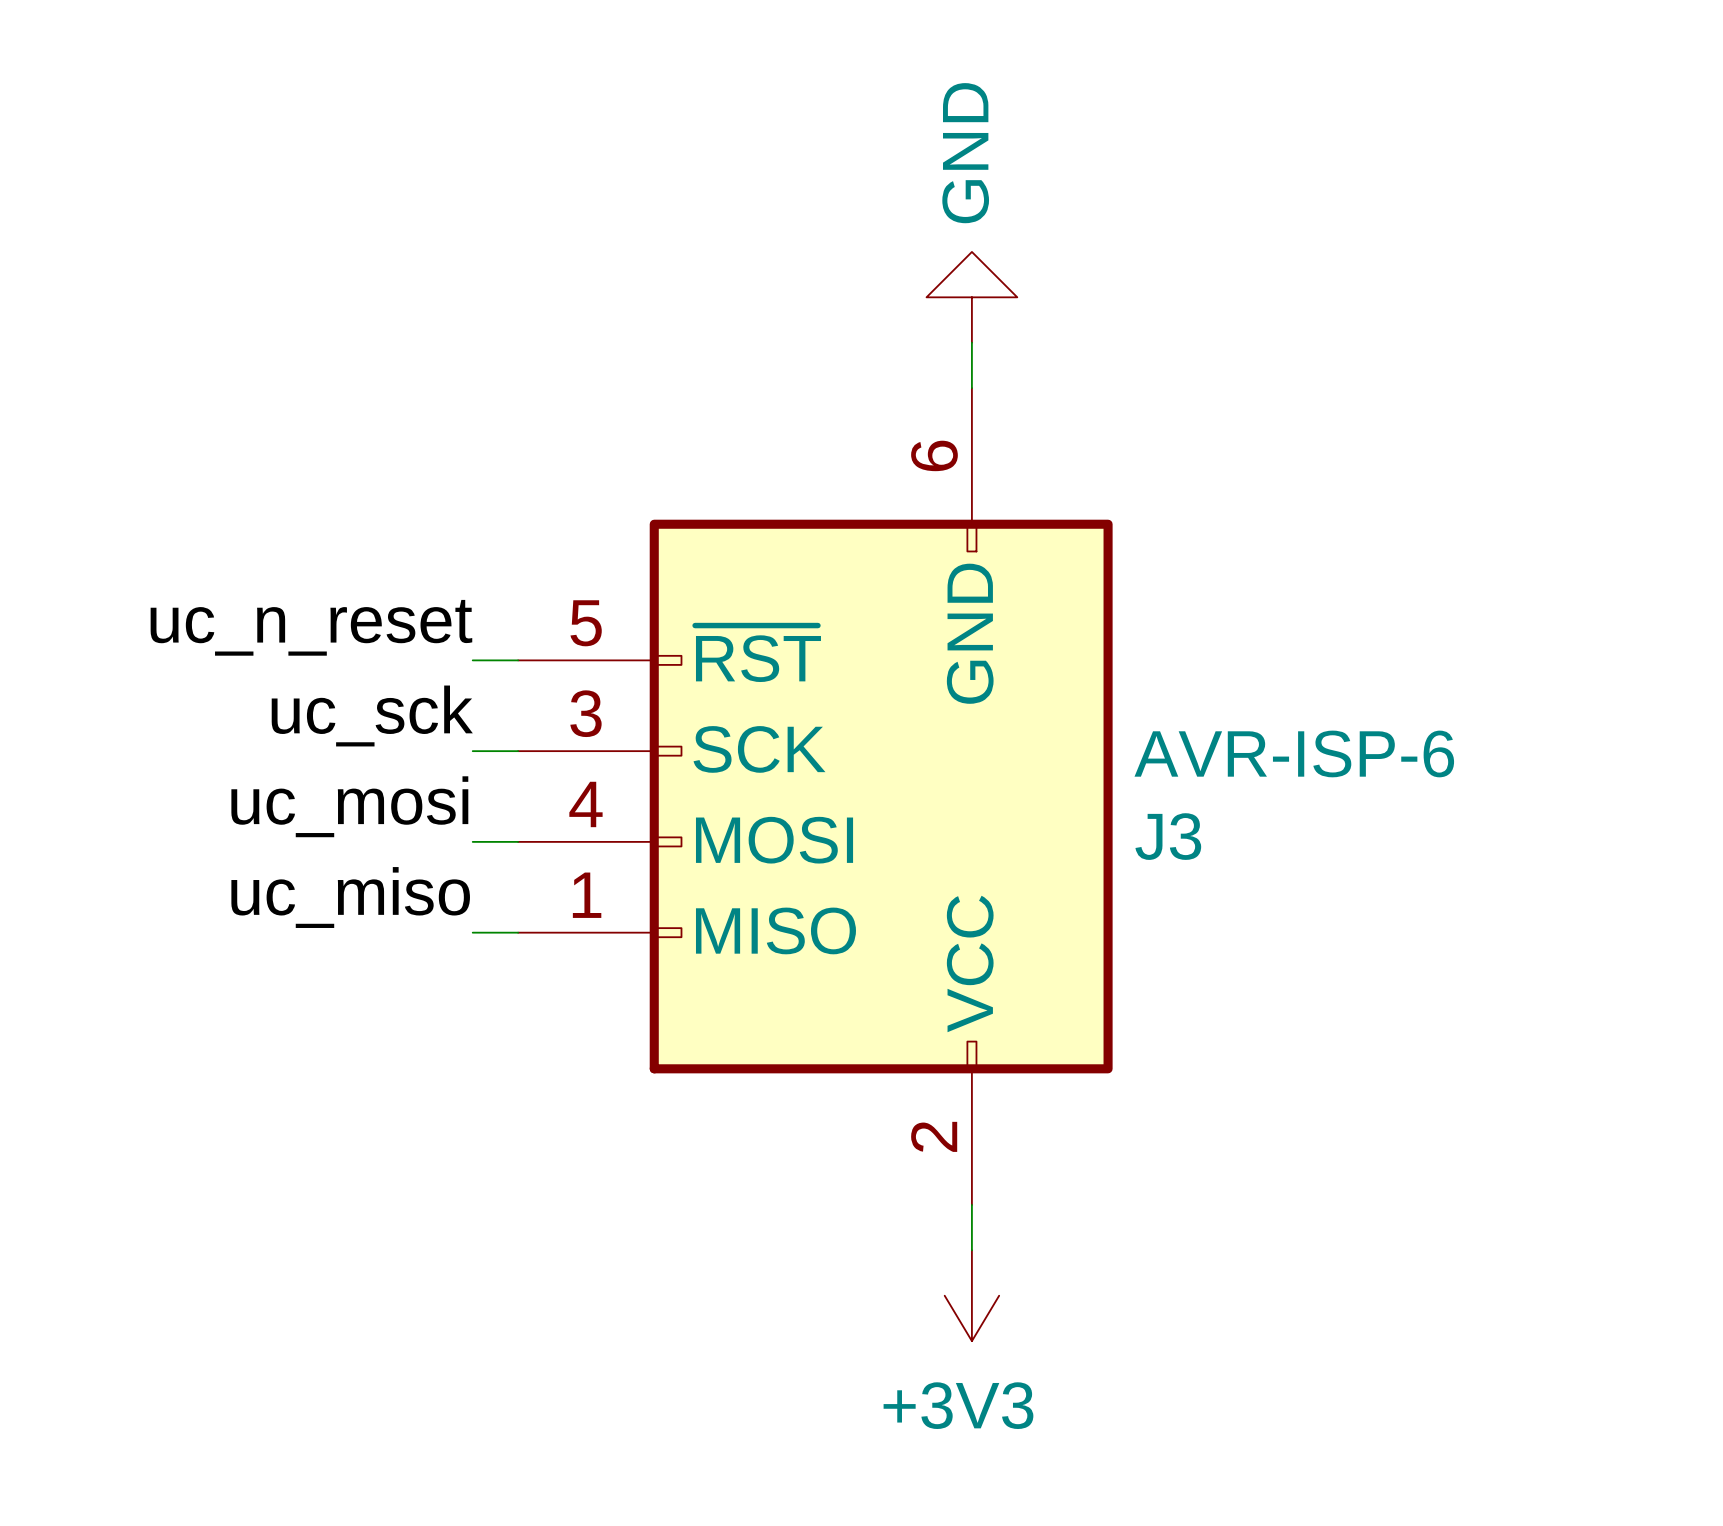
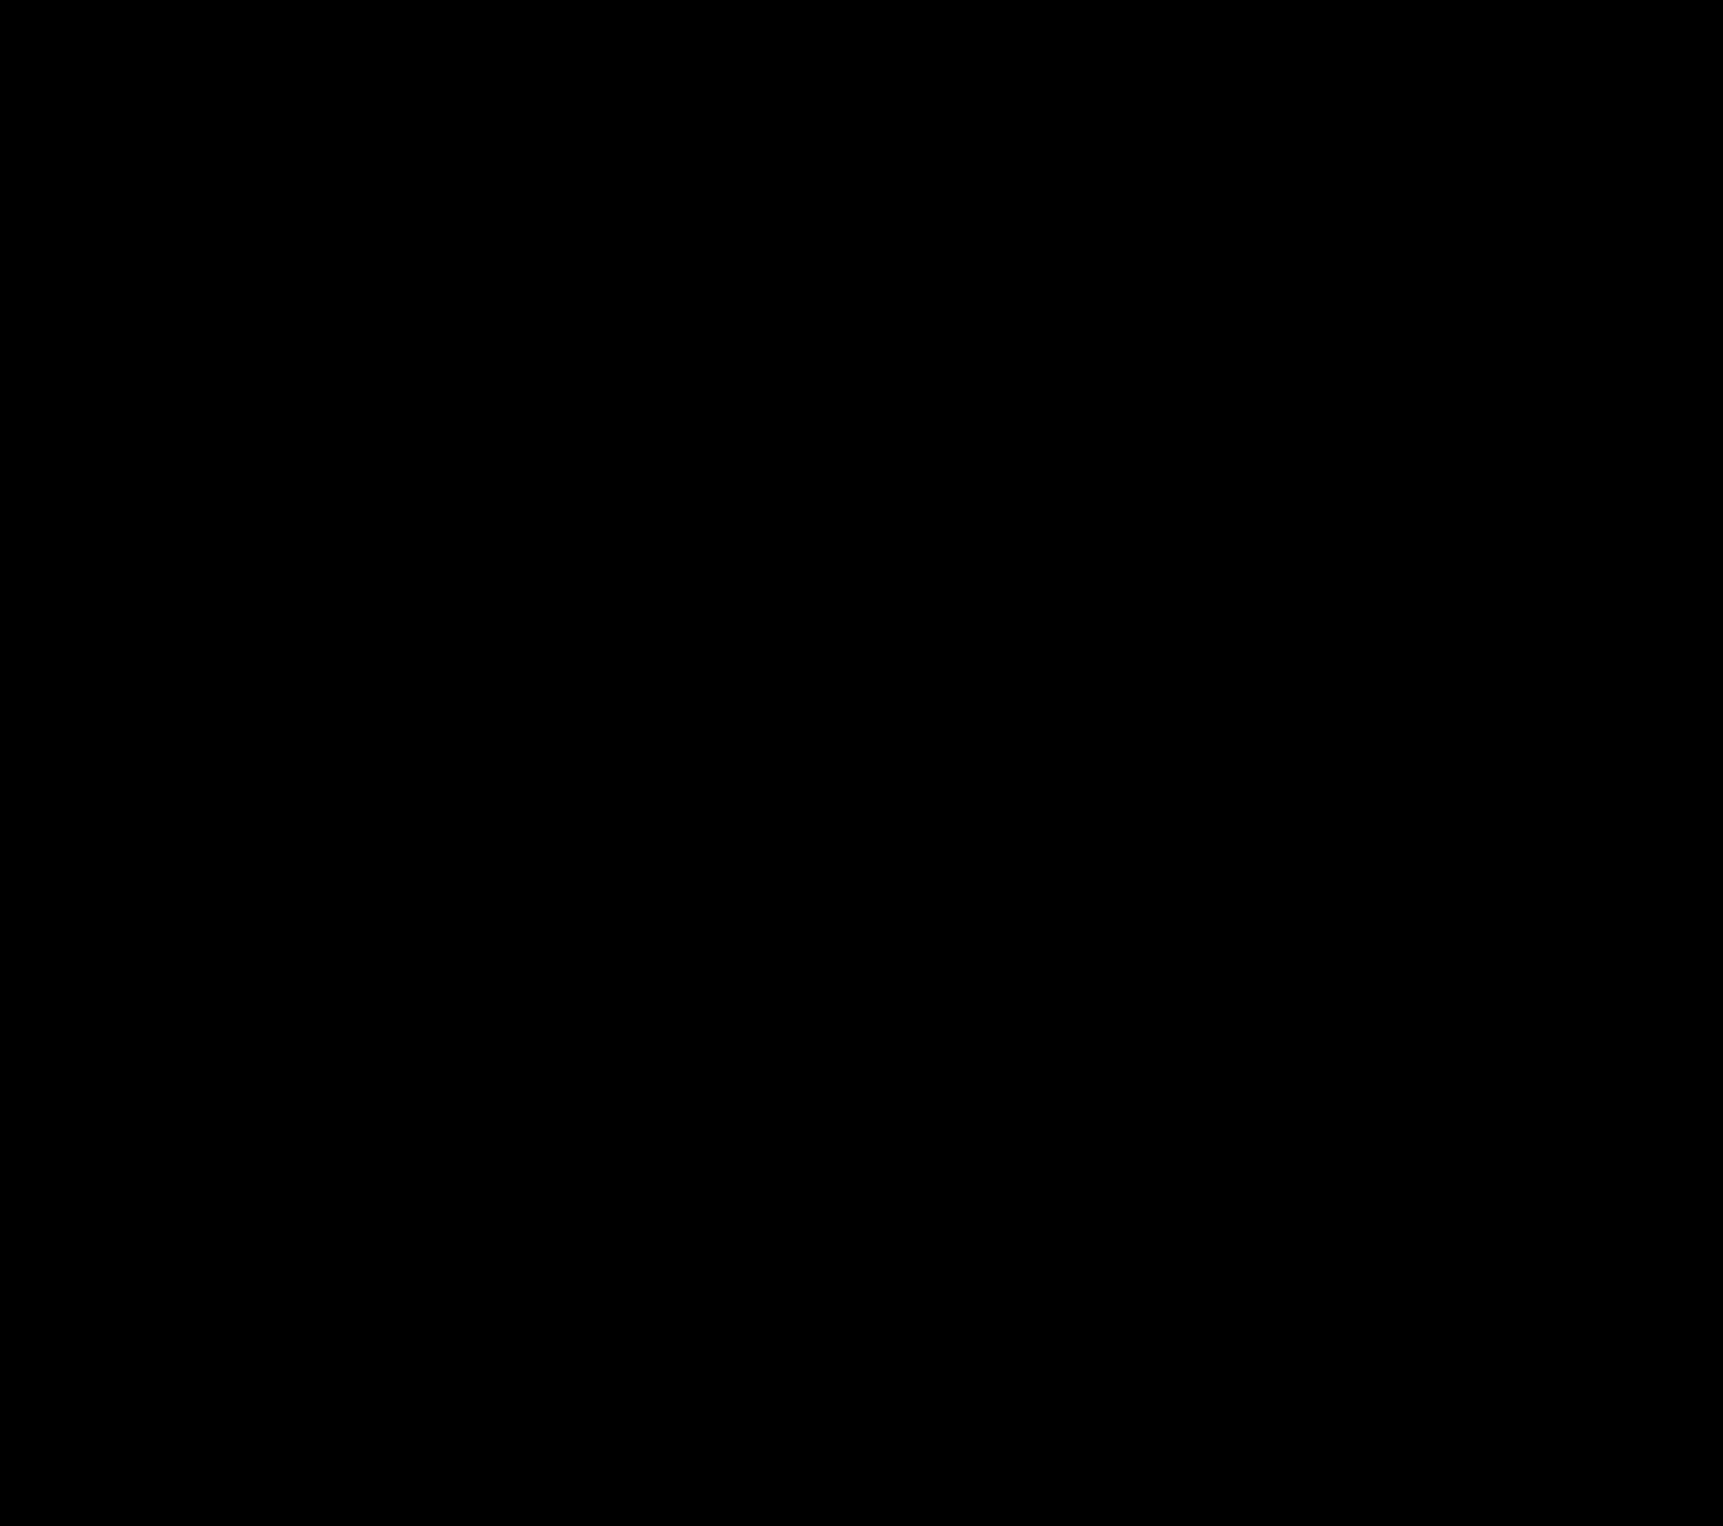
power symbol: GND (971, 297) -> none
wire: (971, 342) (971, 388) -> none
label: uc_n_reset (311, 627) -> none
wire: (472, 660) (518, 660) -> none
label: uc_sck (372, 715) -> none
wire: (472, 751) (518, 751) -> none
J3: AVR-ISP-6 (815, 796) -> none
label: uc_mosi (349, 806) -> none
wire: (472, 841) (518, 841) -> none
label: uc_miso (350, 897) -> none
wire: (472, 932) (518, 932) -> none
wire: (971, 1204) (971, 1250) -> none
power symbol: +3V3 (971, 1295) -> none

